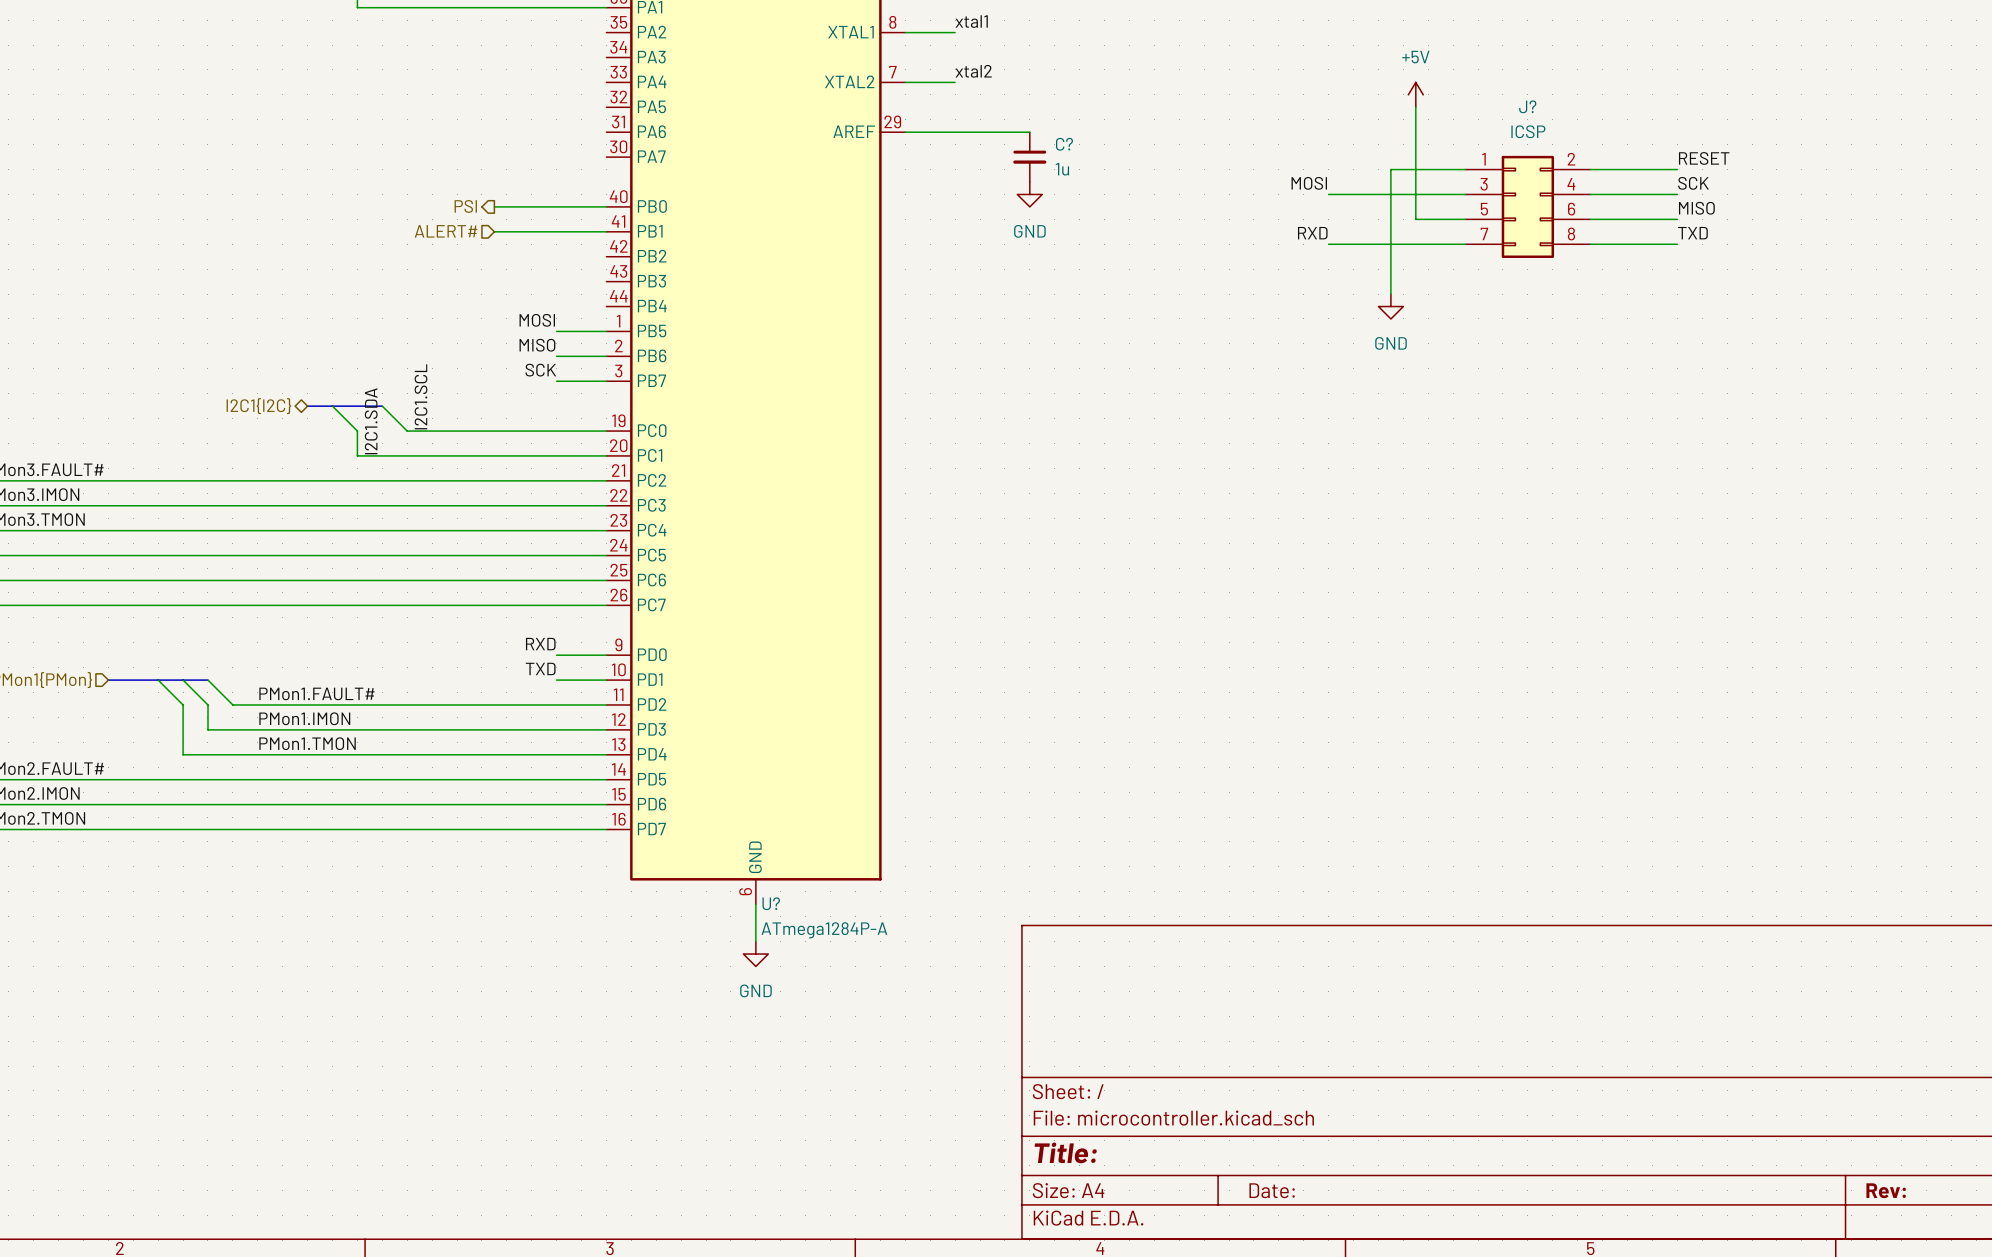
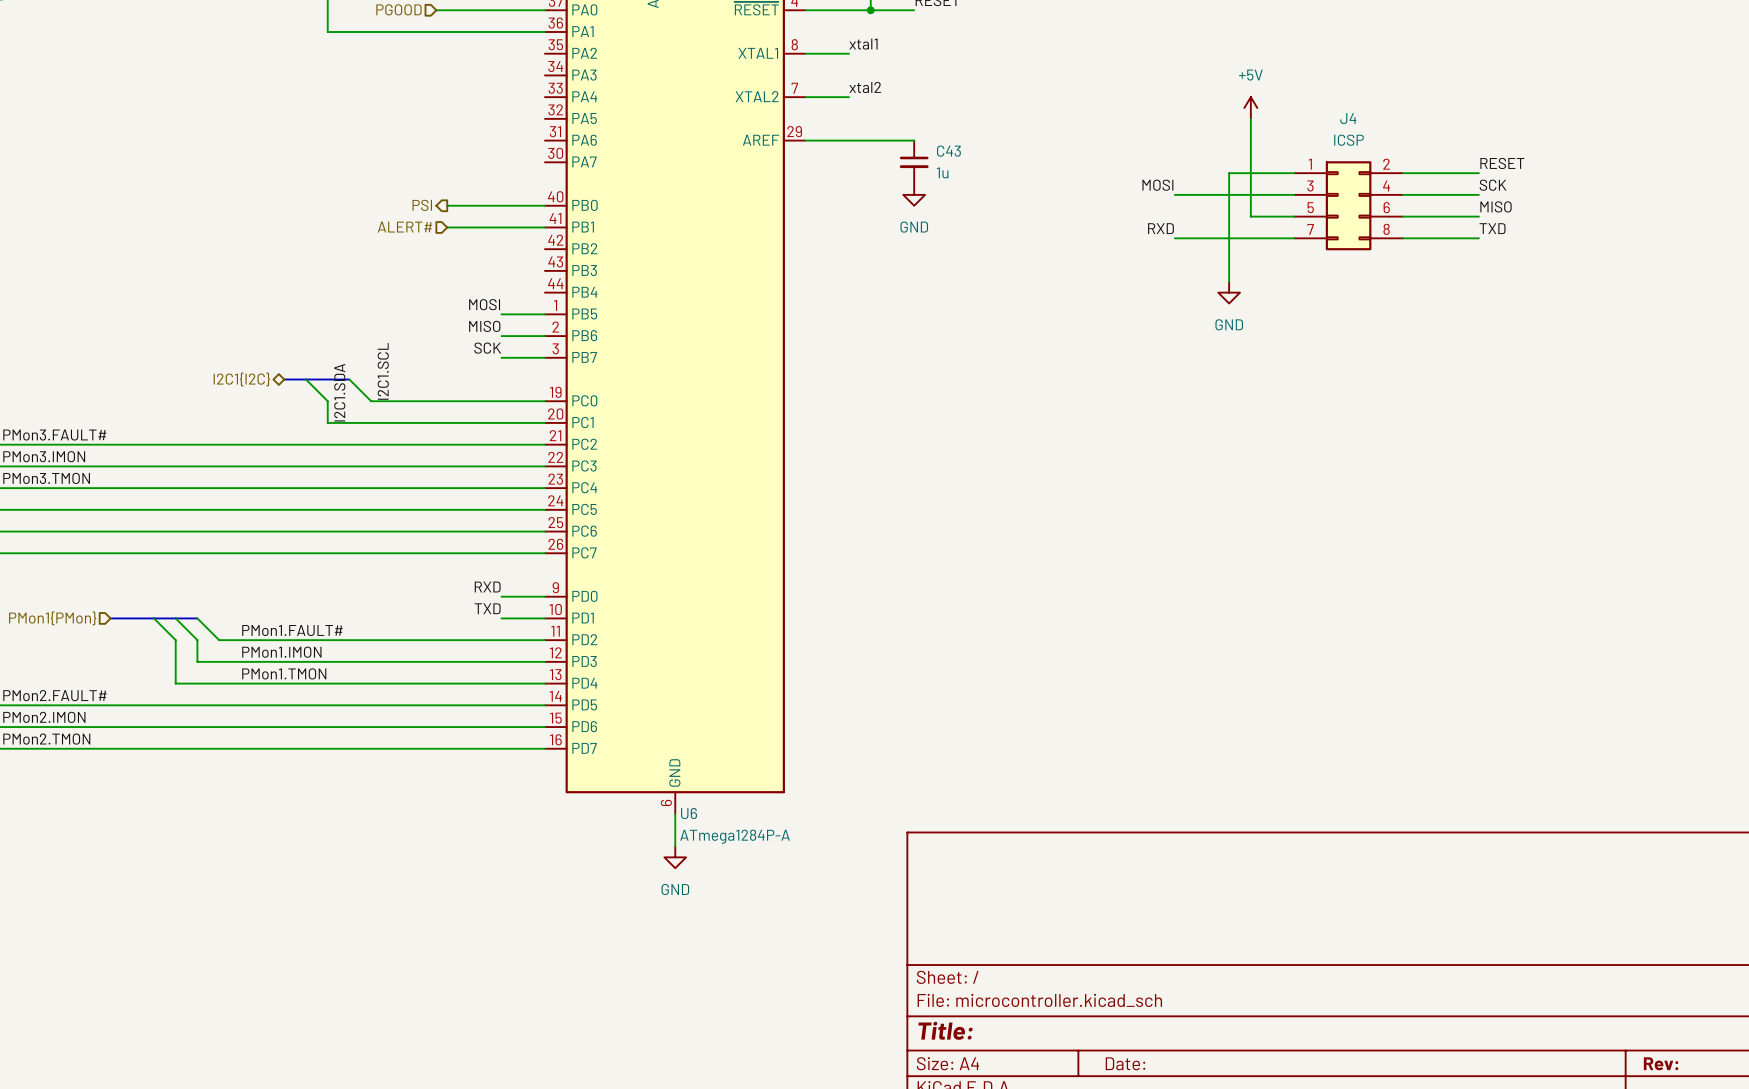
J? name: J? (1527, 106) -> J4 (1348, 118)
C? name: C? (1064, 144) -> C43 (948, 151)
U? name: U? (771, 903) -> U6 (689, 813)

